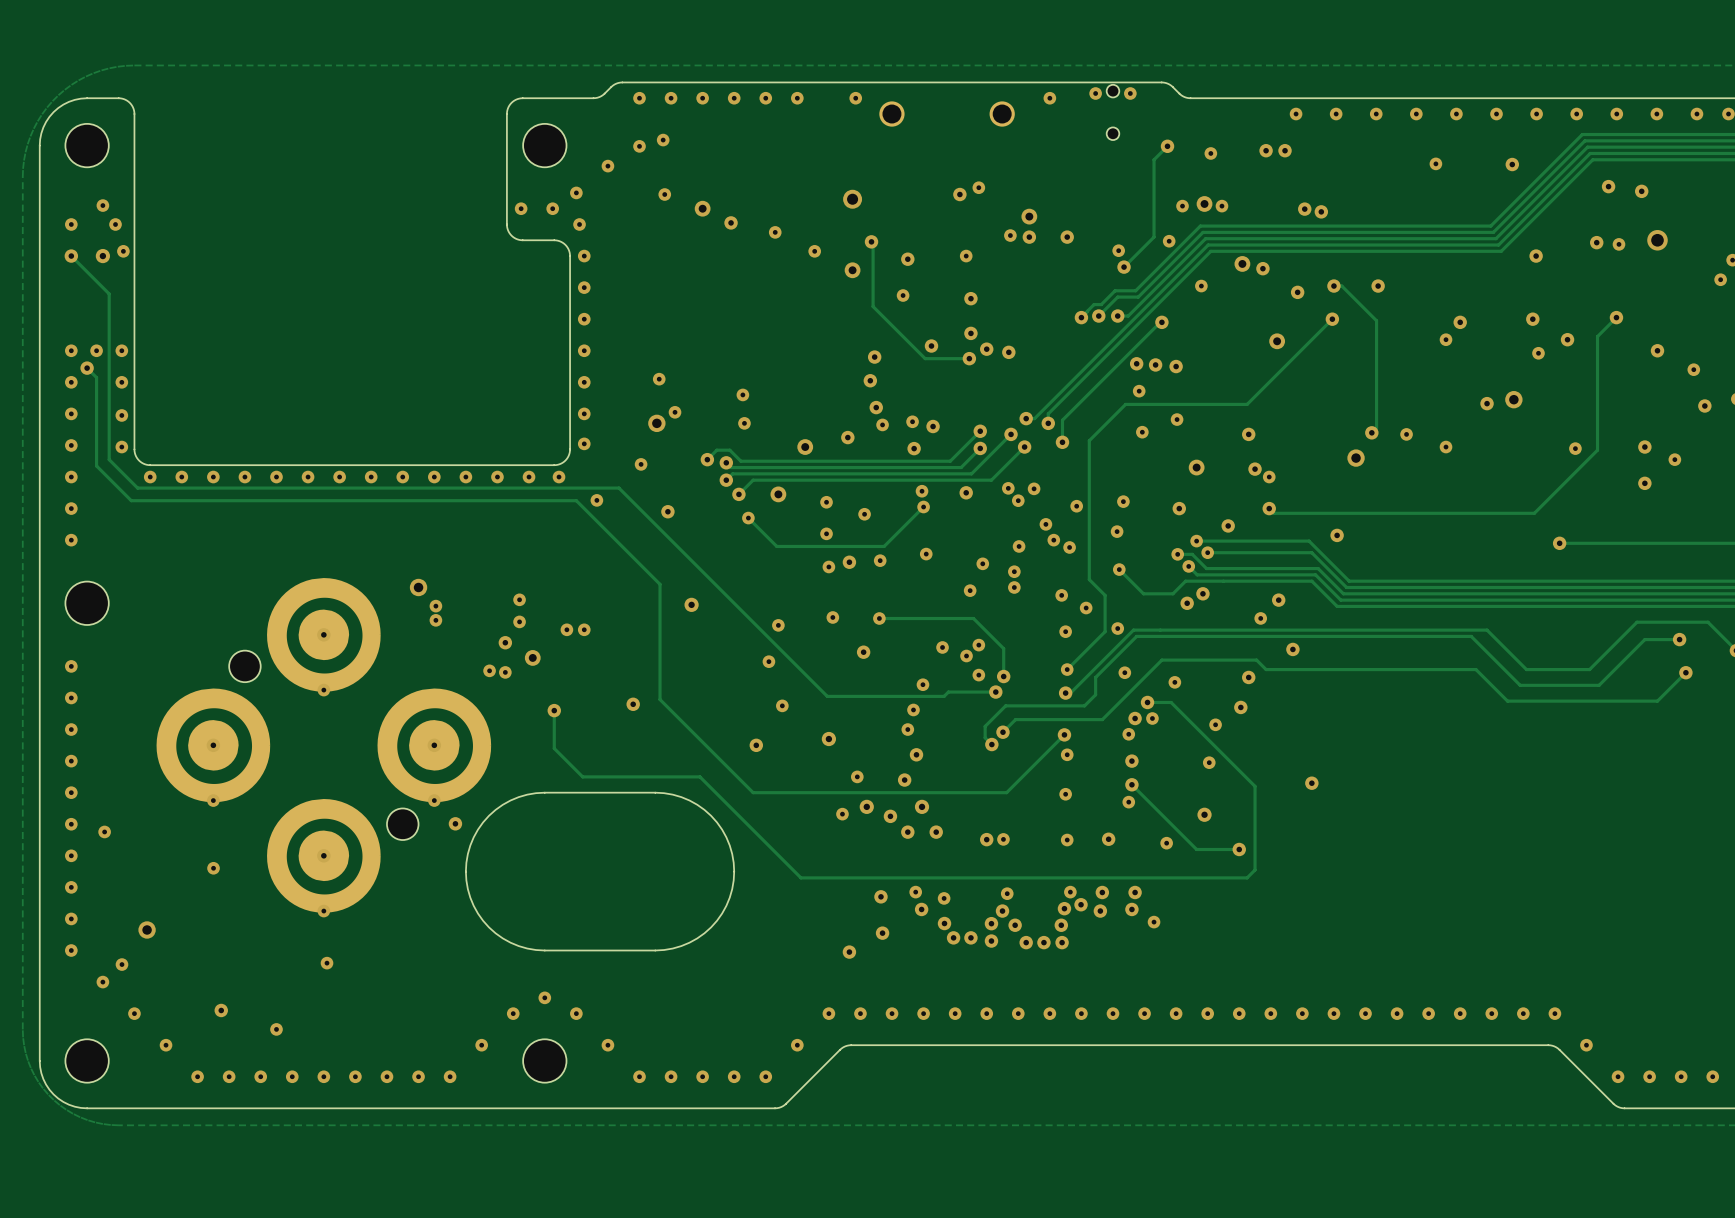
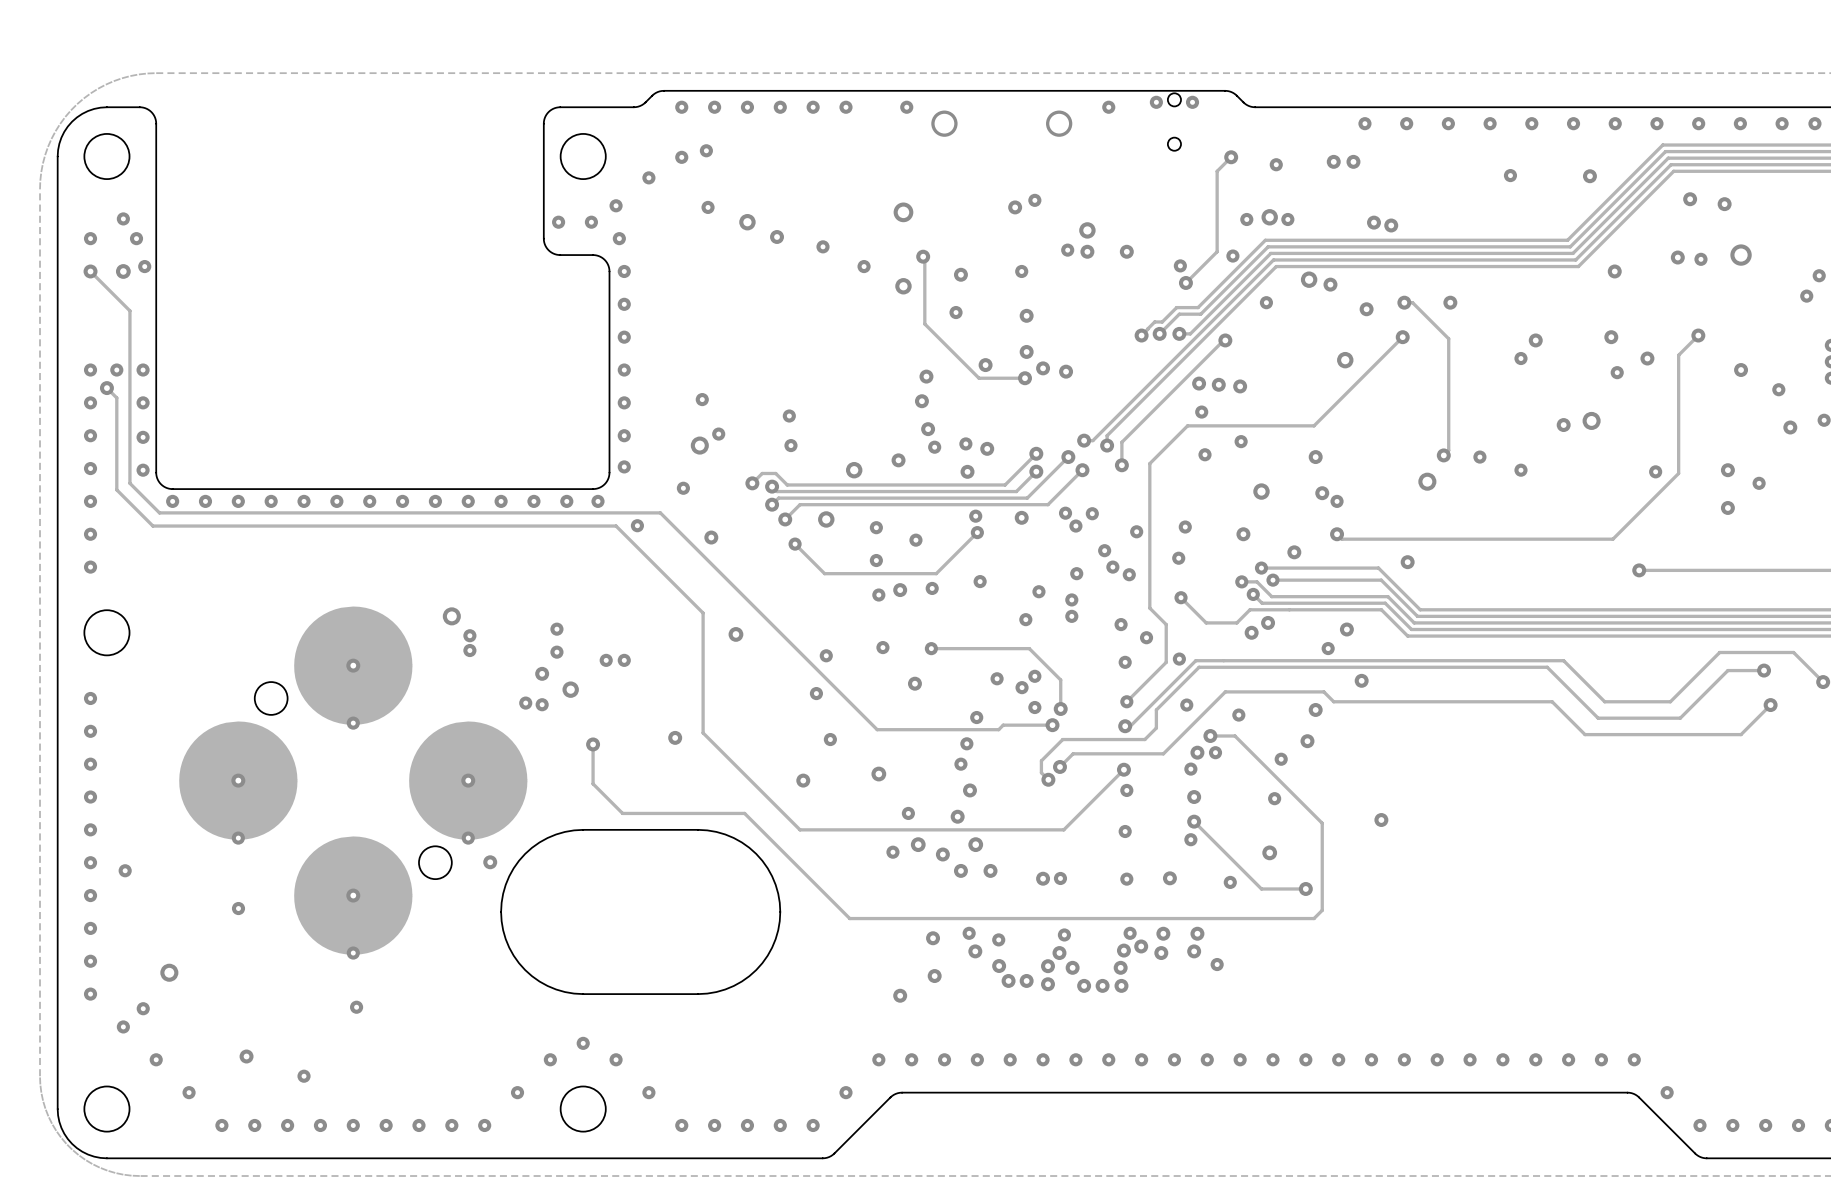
part footprint: [156, 578, 492, 915] -> [179, 606, 528, 958]

